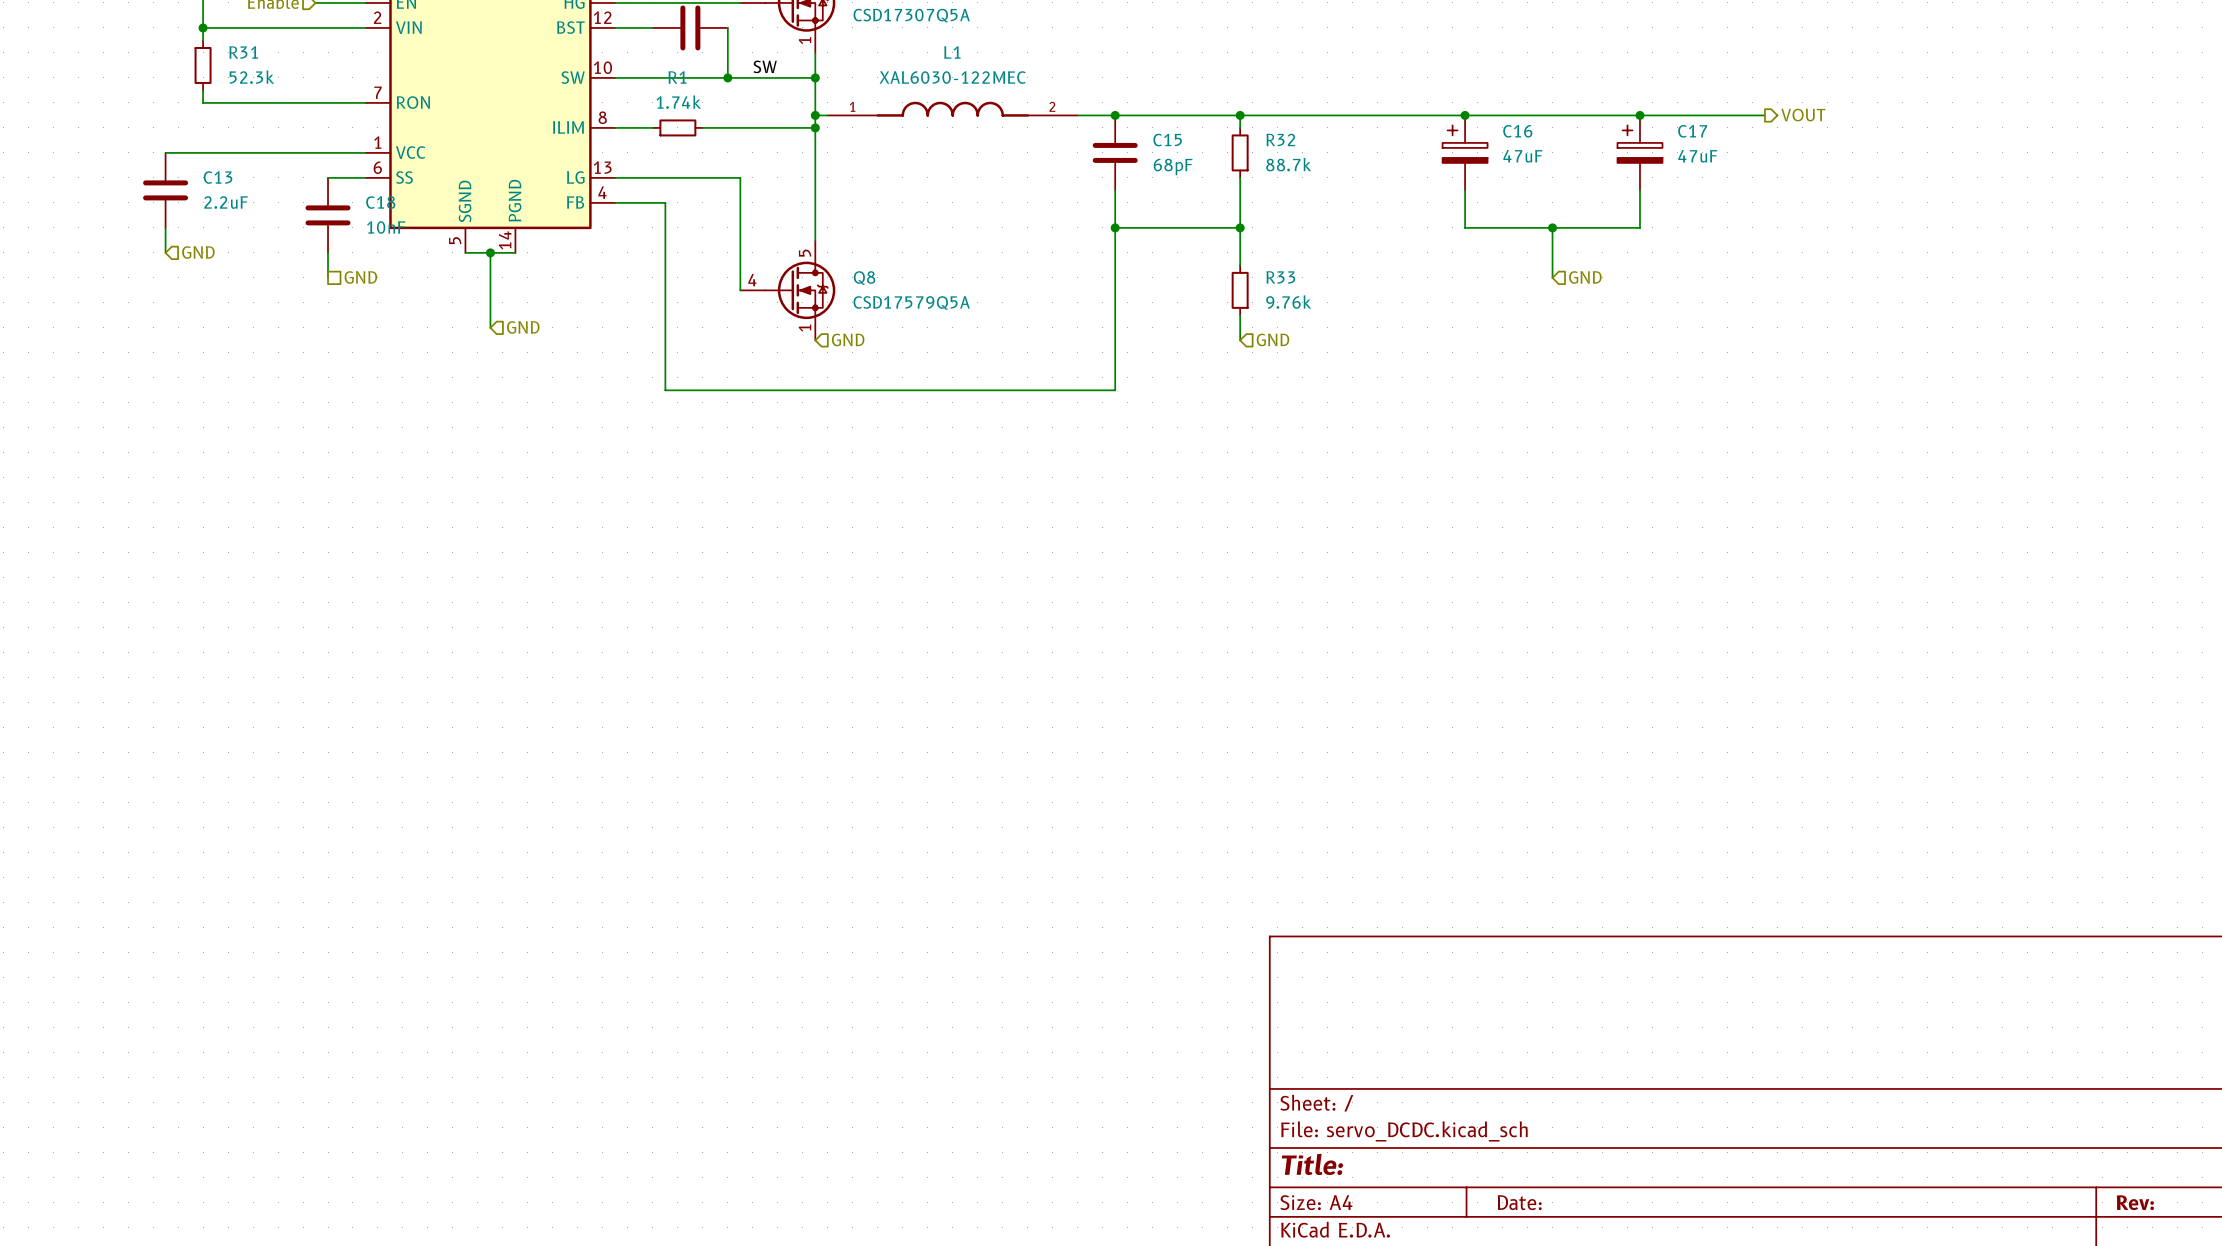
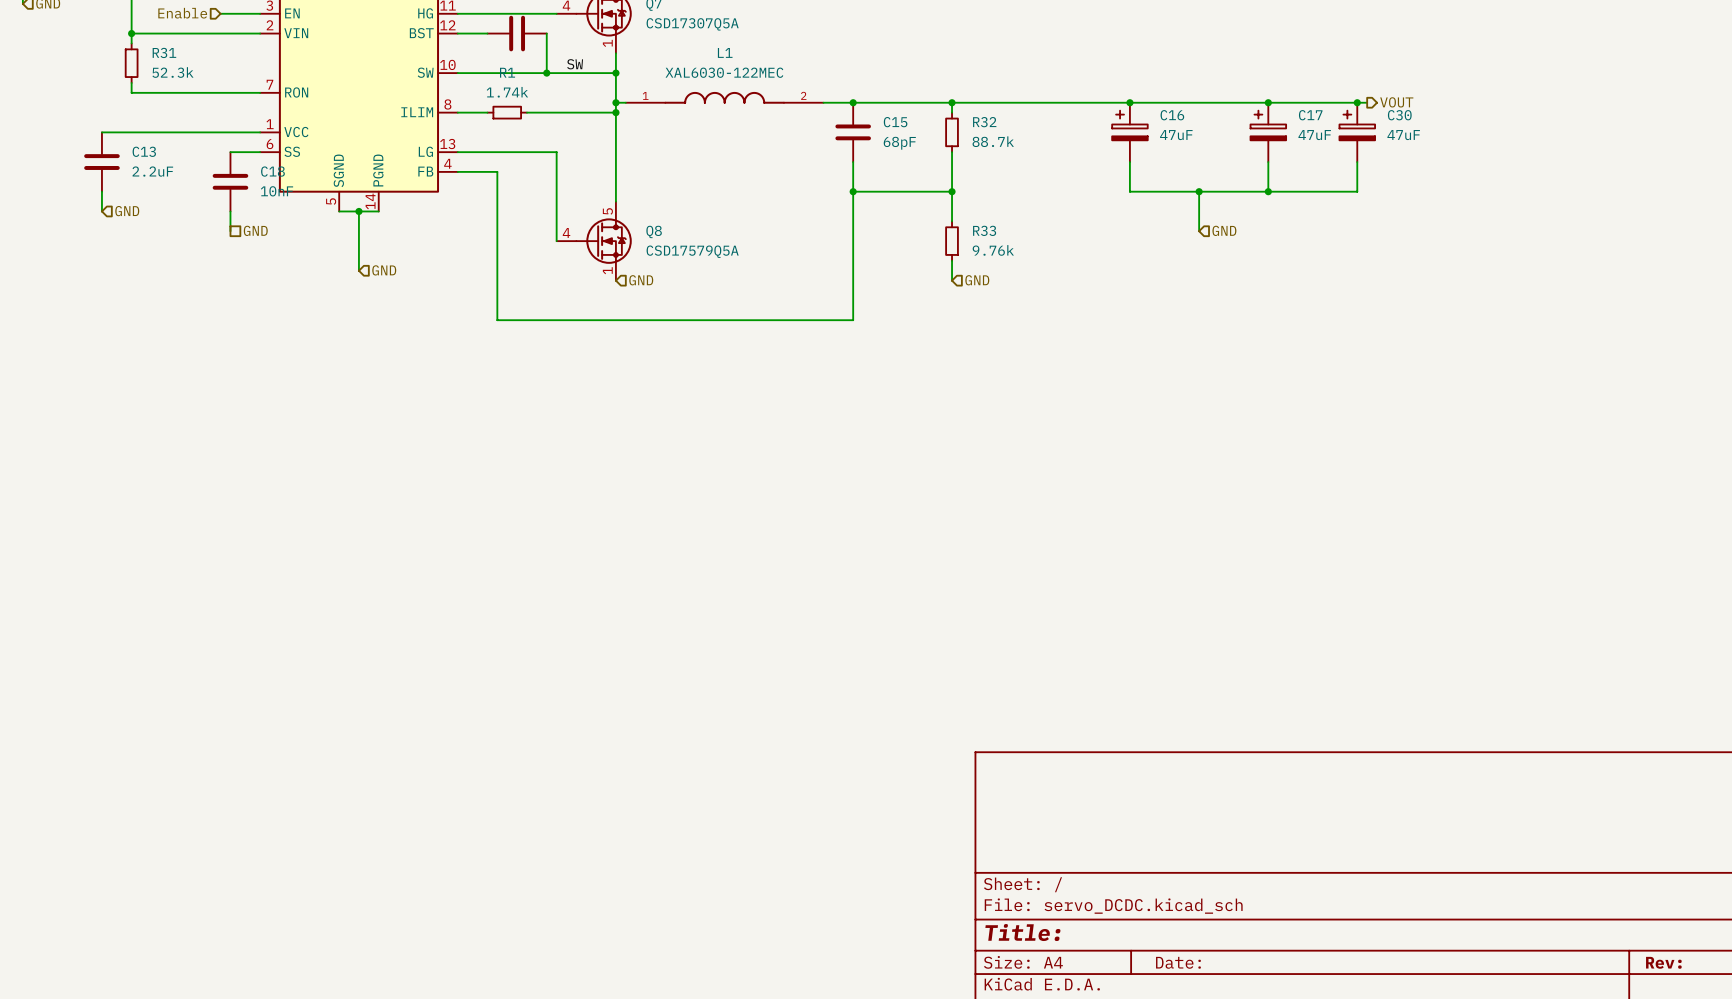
junction: none -> (1357, 102)
C30: none -> 47uF (1357, 132)
wire: none -> (1357, 162) (1357, 191) (1268, 191)
junction: none -> (1268, 191)

